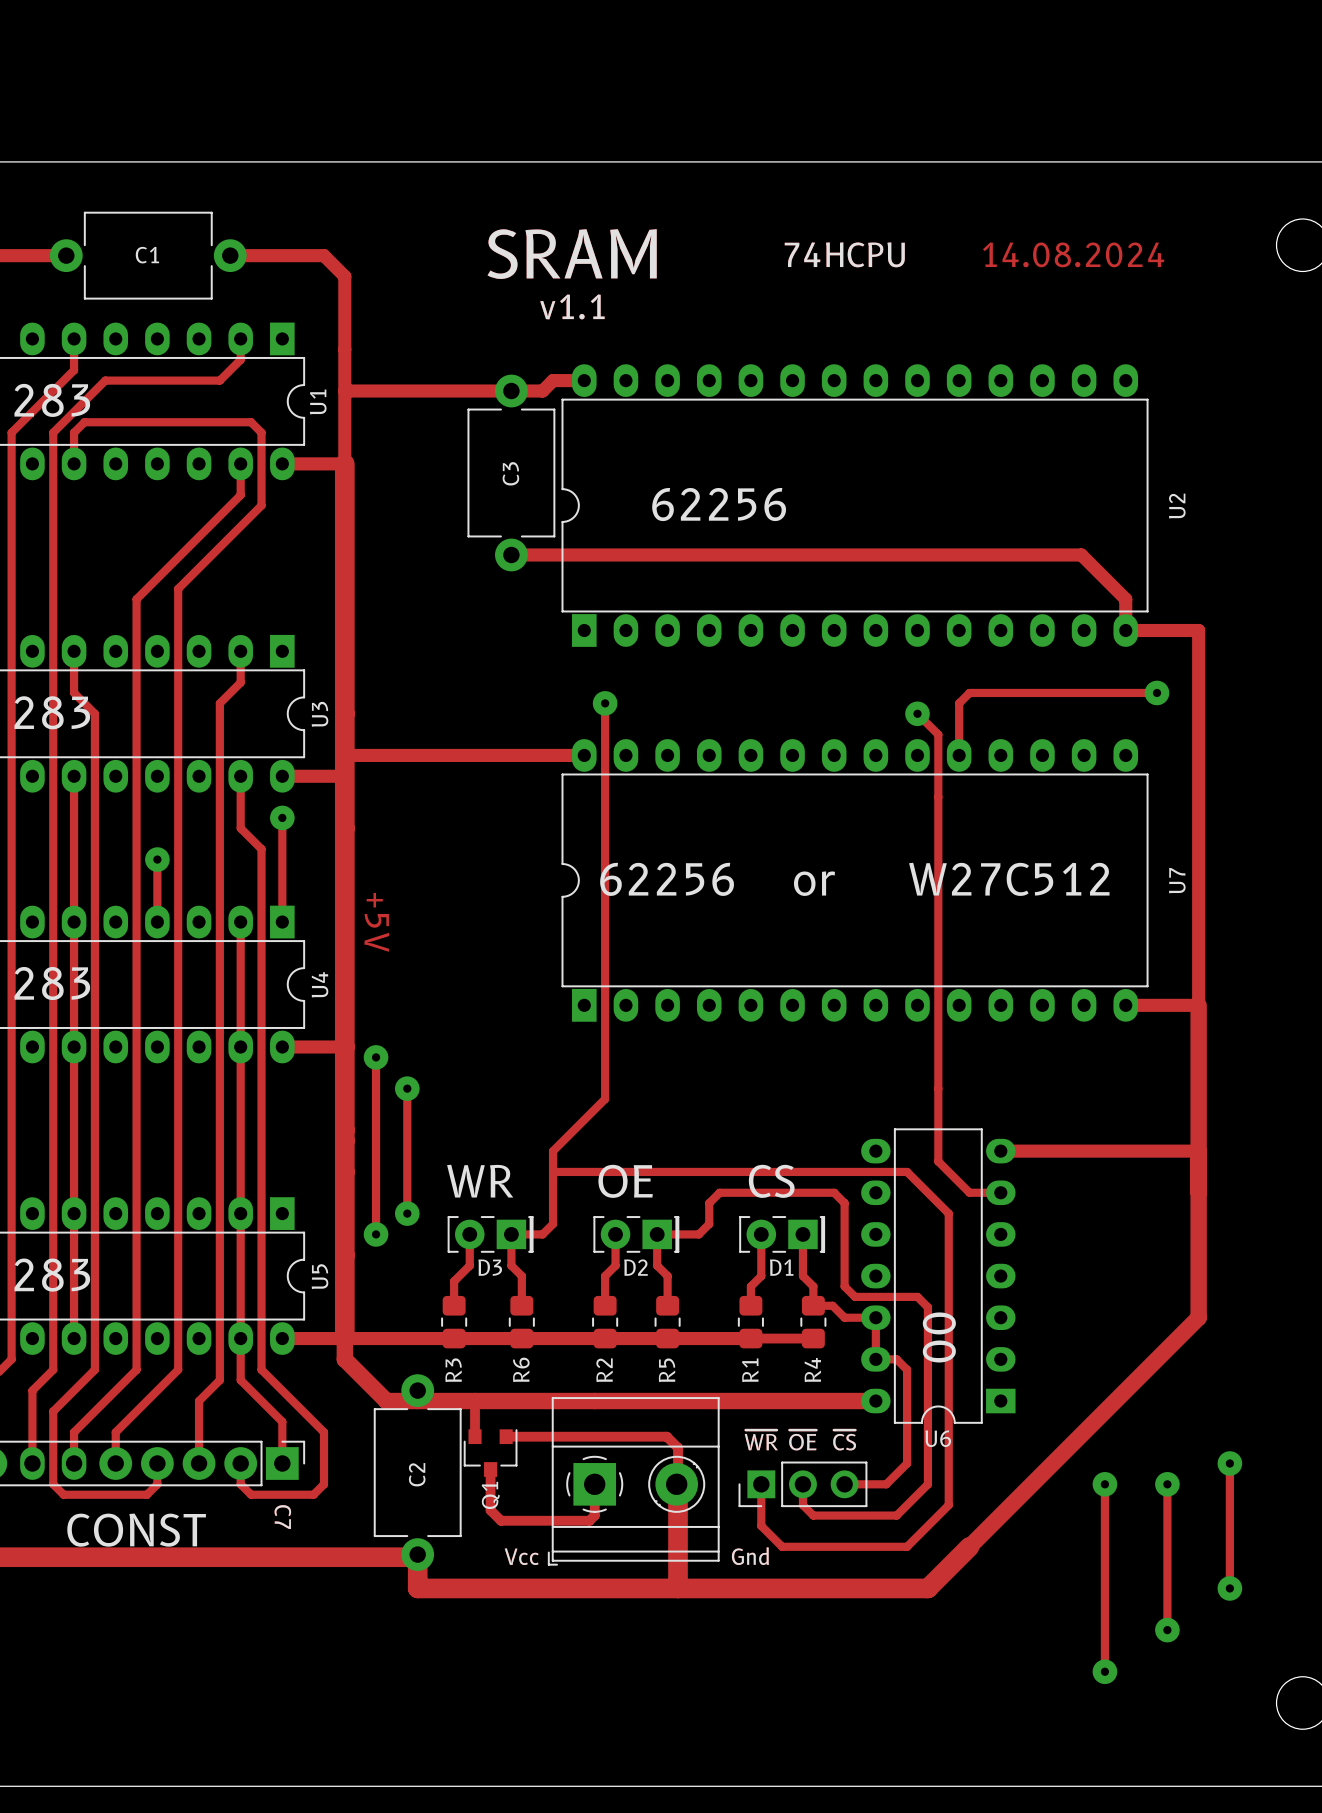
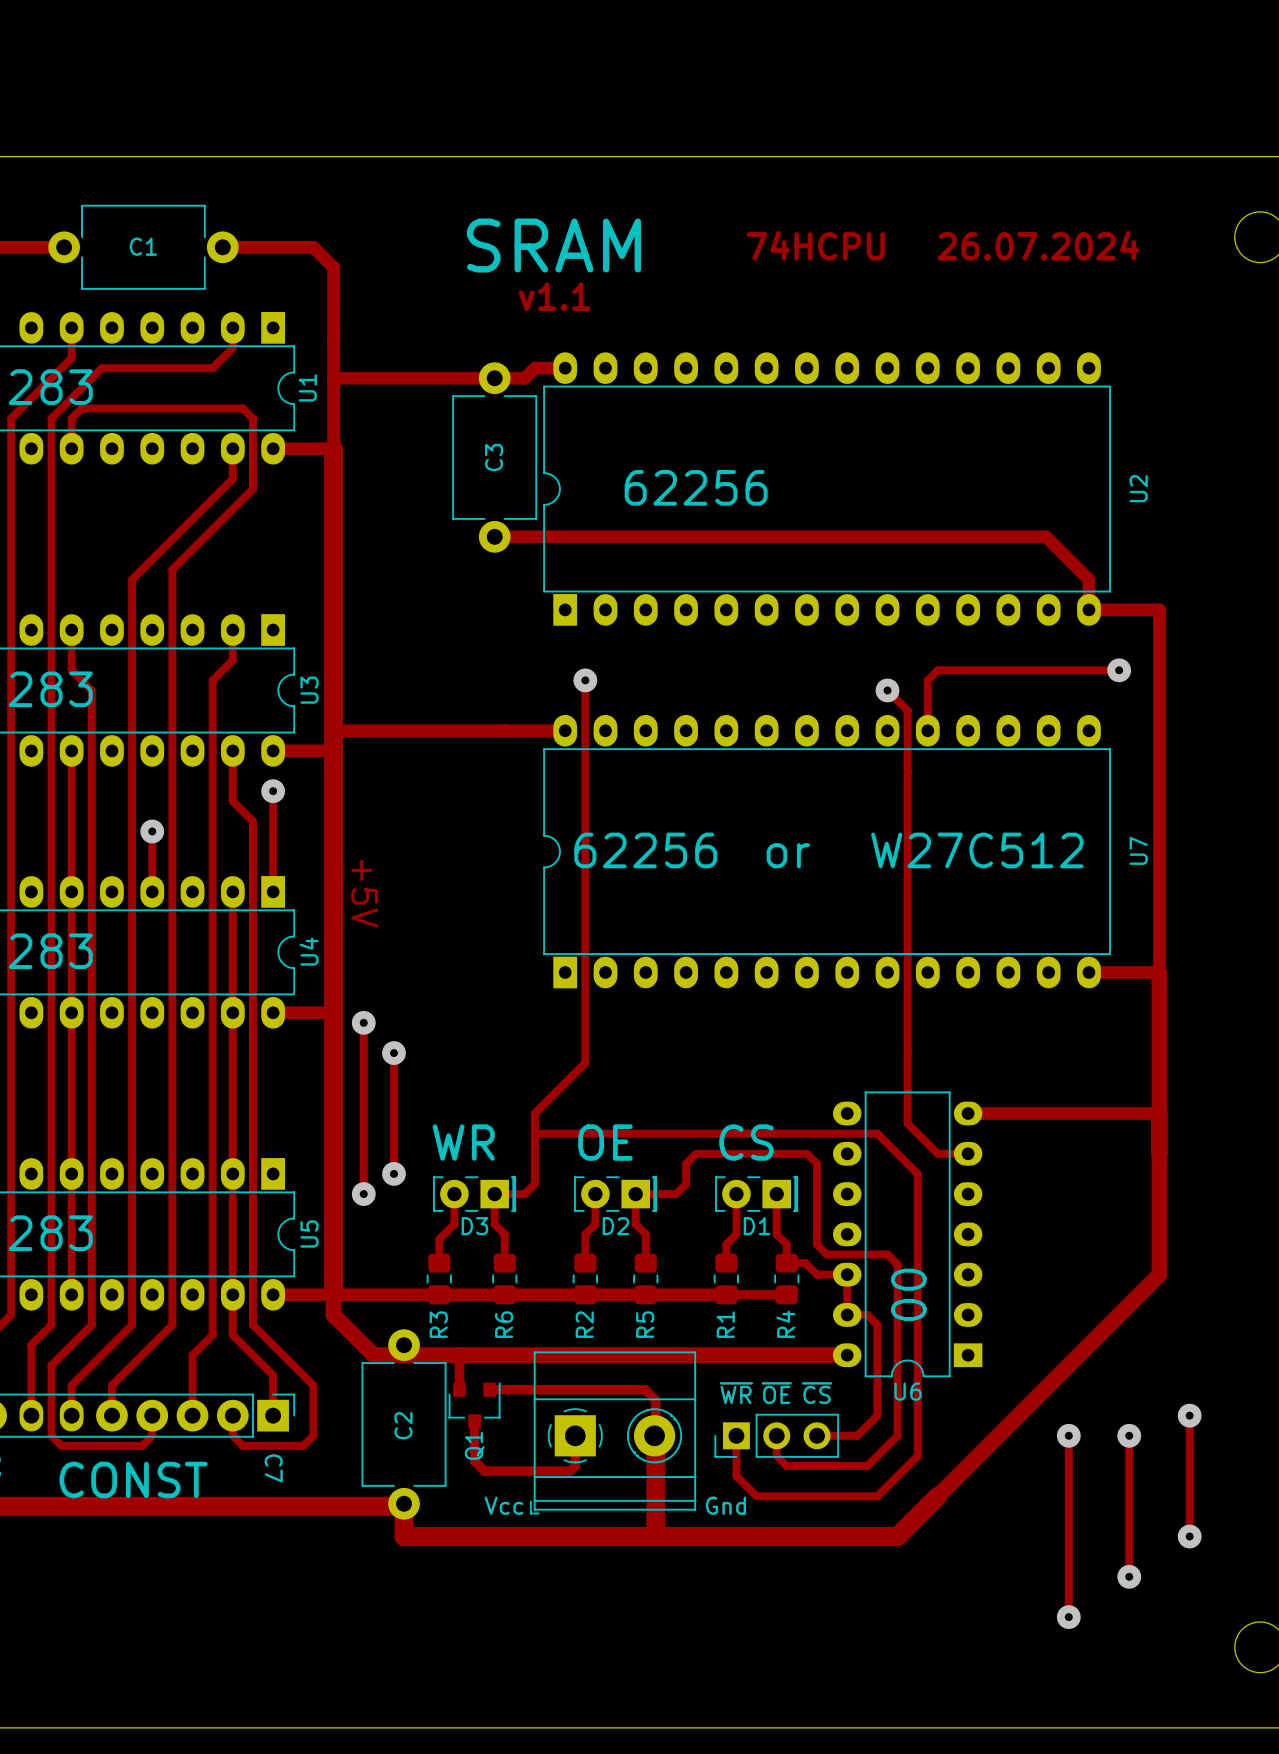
text: 74HCPU (844, 254) -> none
text: 14.08.2024 (1073, 254) -> 26.07.2024 (1038, 245)
text: v1.1 (572, 306) -> none

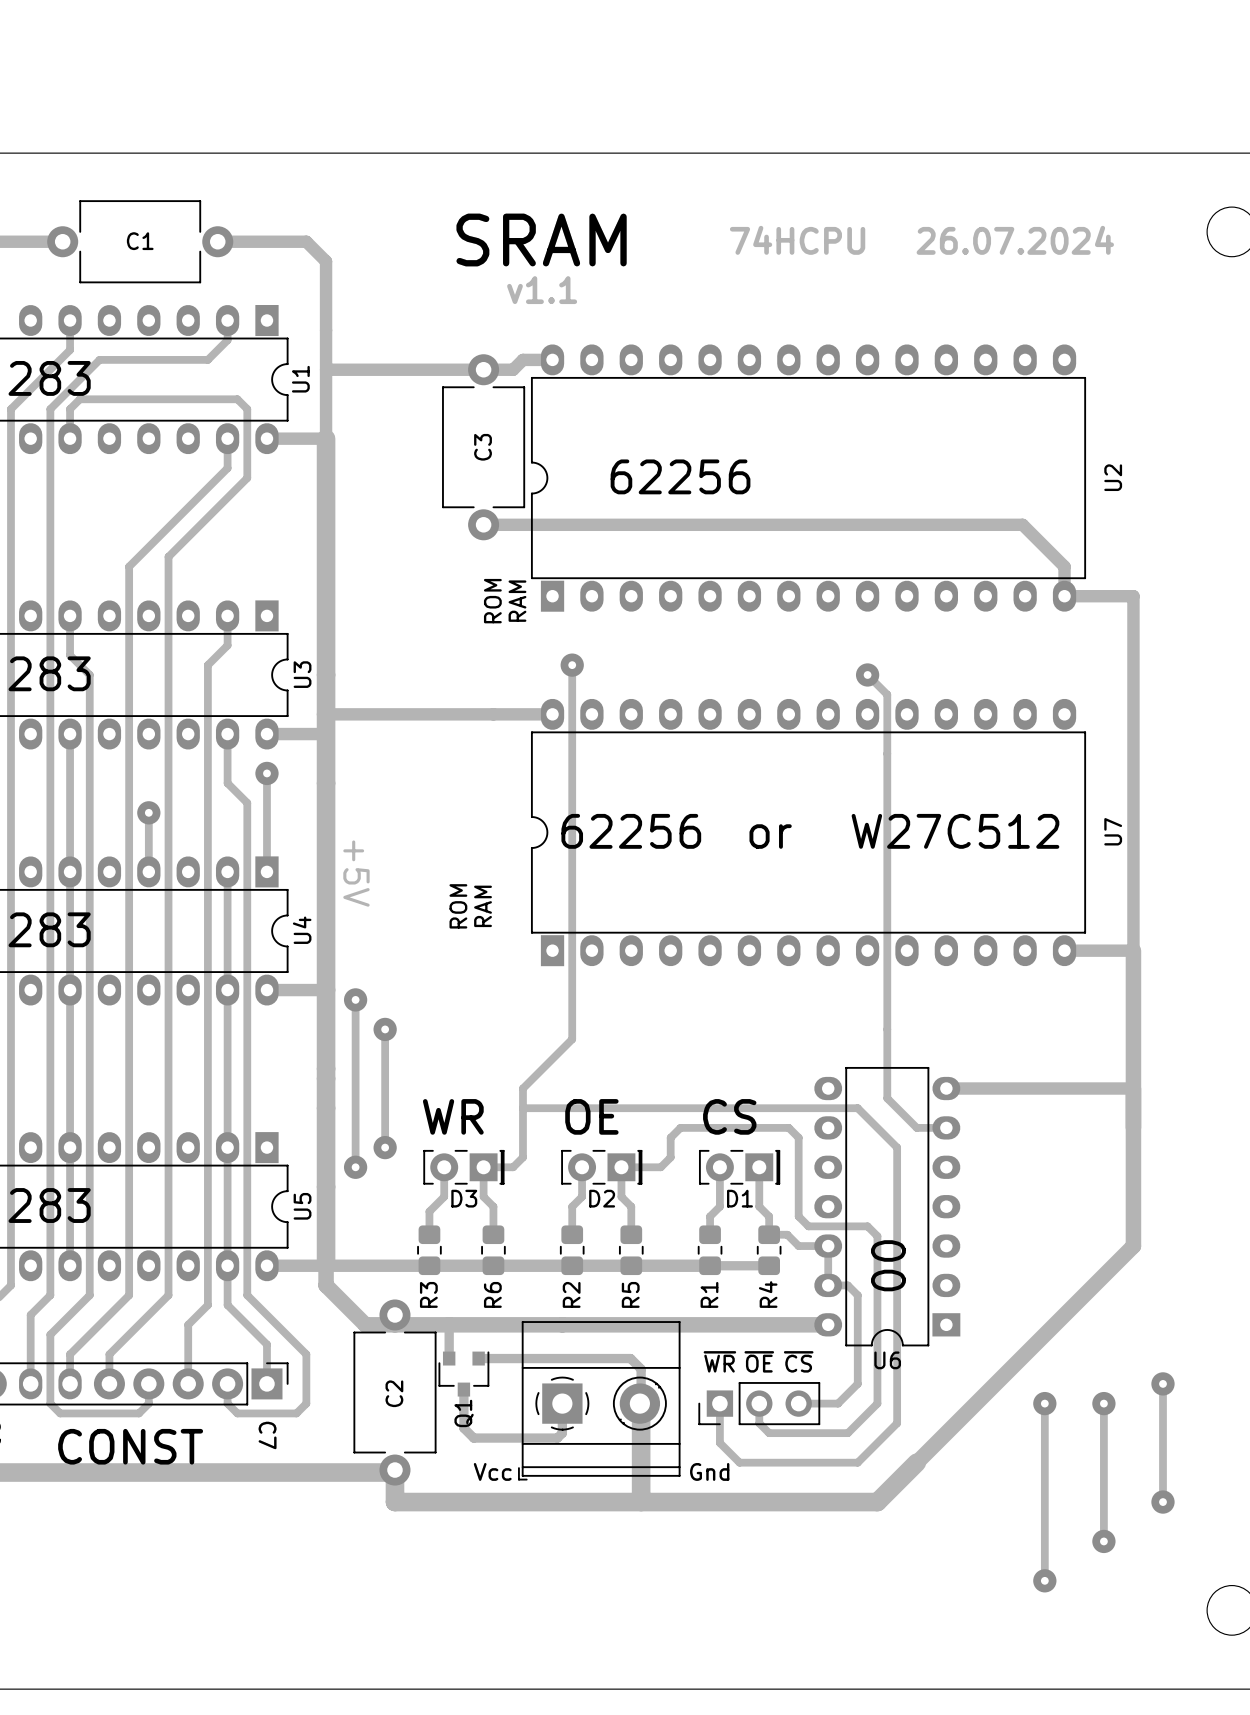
text: none -> ROM (492, 601)
text: none -> RAM (517, 601)
track: (1119, 670) (937, 670) (927, 680) (927, 730) -> none
via: (1119, 670) -> none
text: none -> ROM (458, 906)
text: none -> RAM (483, 906)

